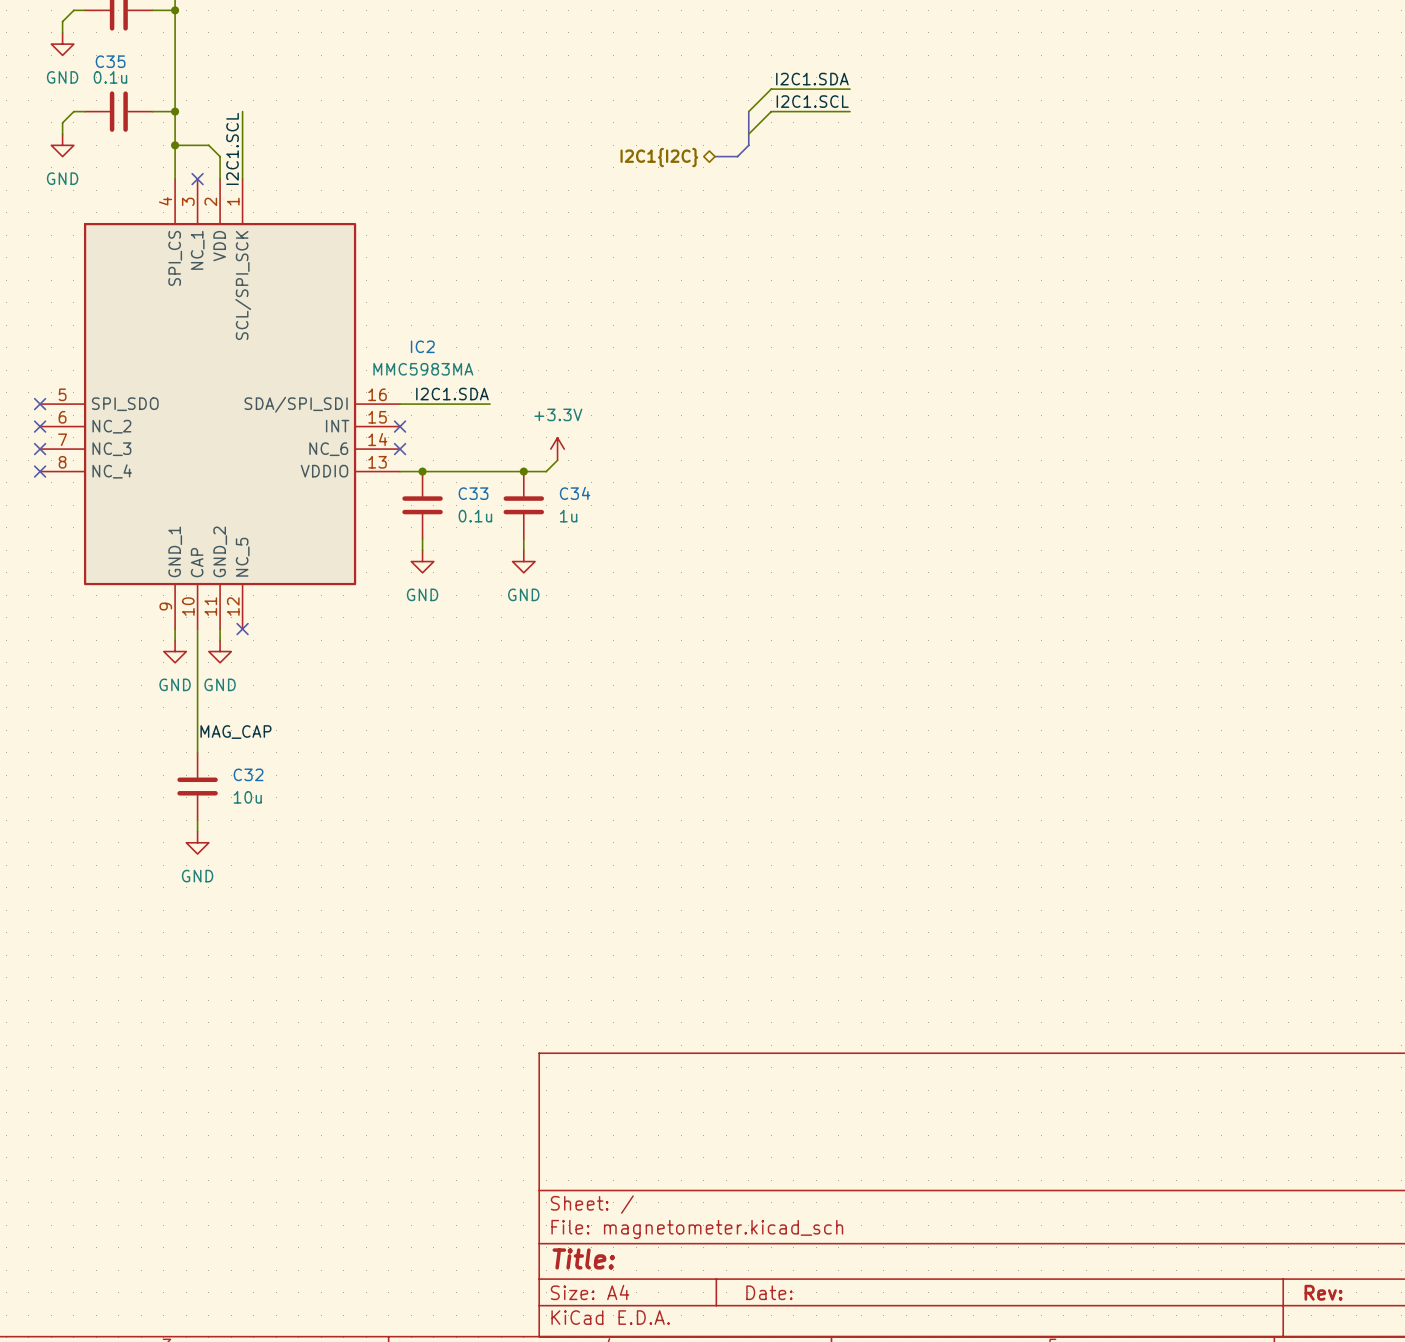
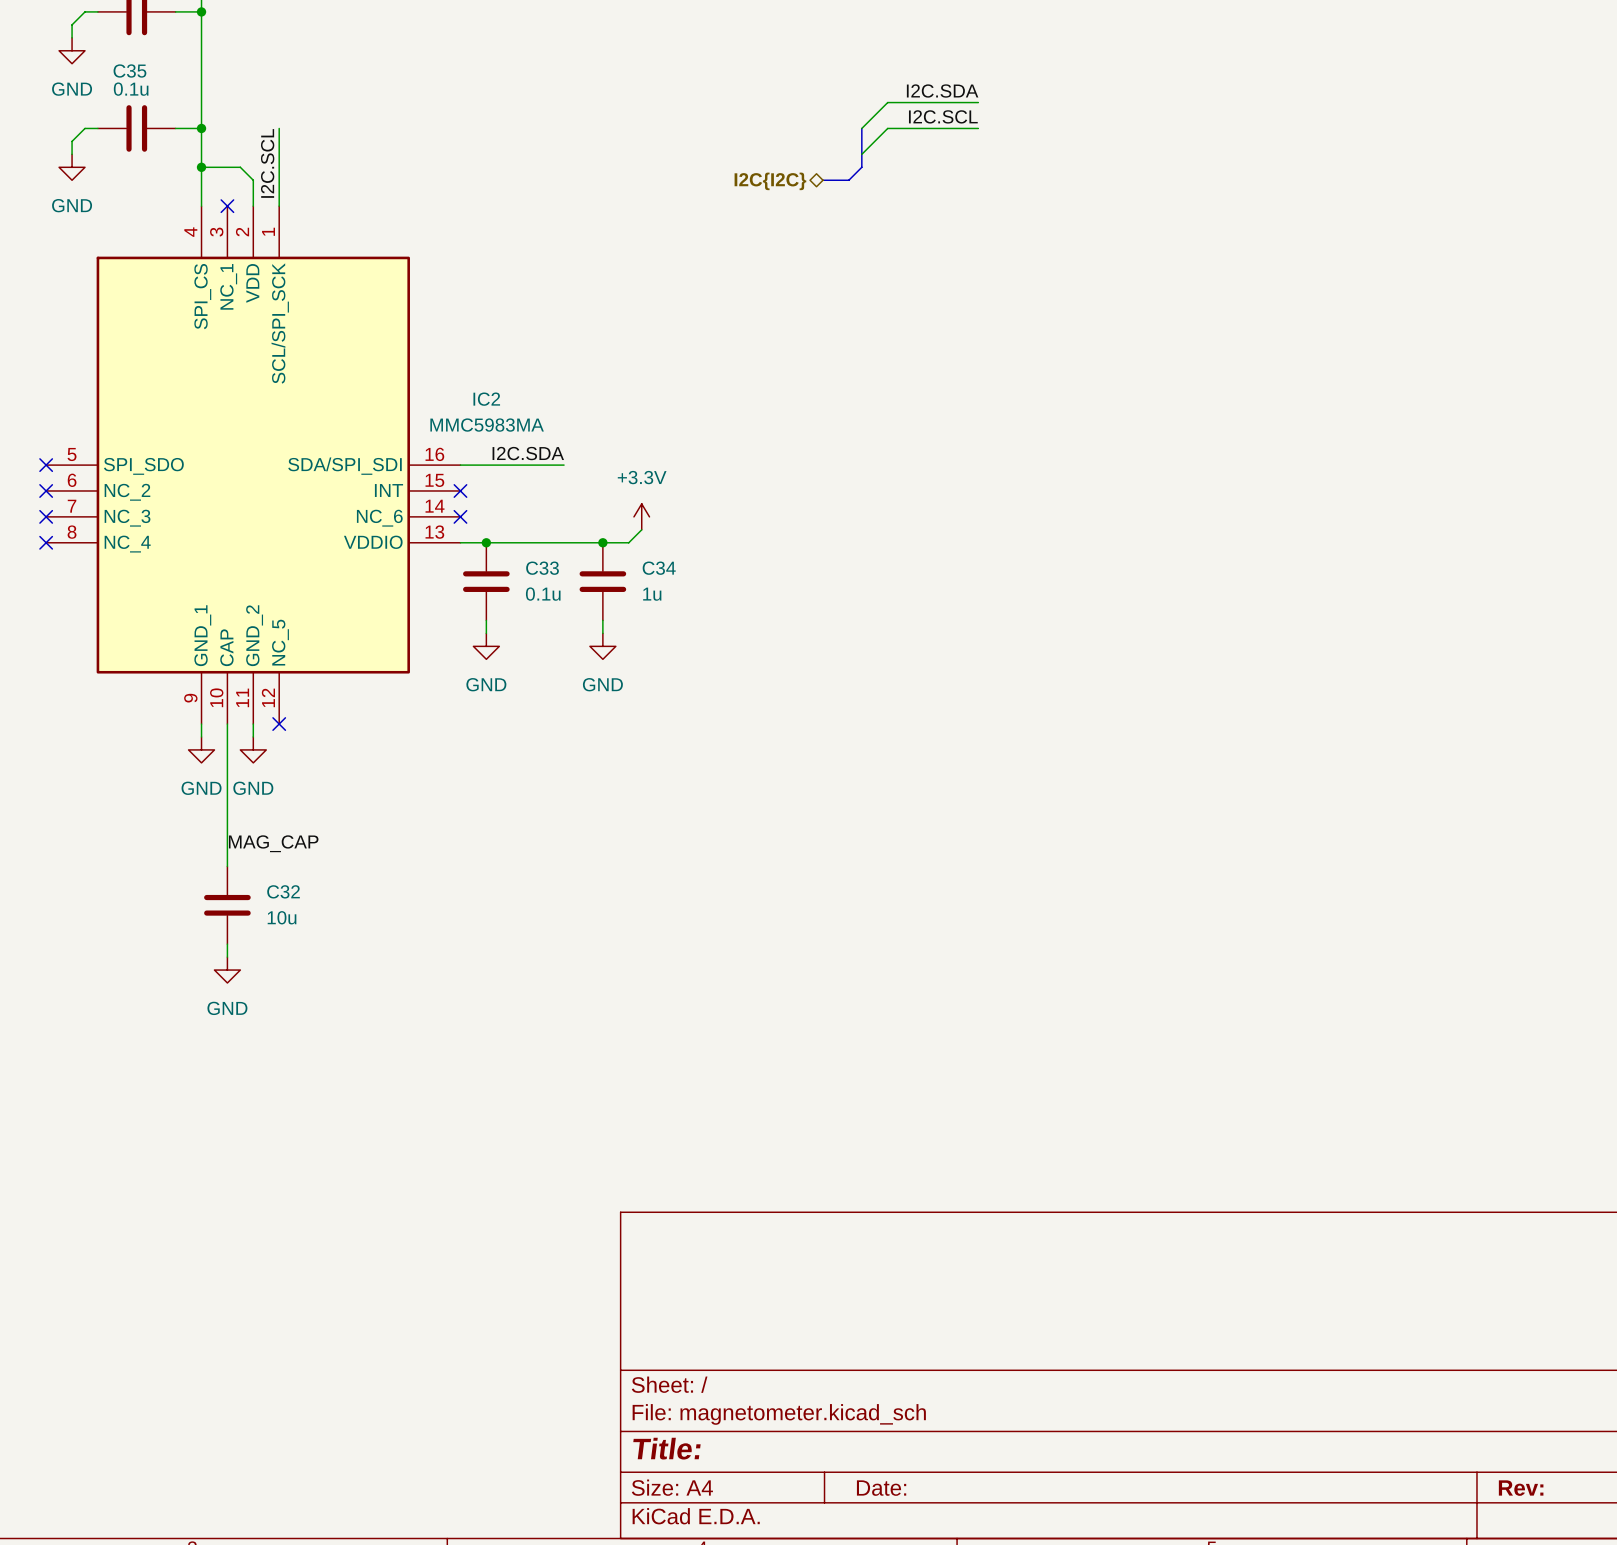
label: I2C1.SDA (812, 79) -> I2C.SDA (942, 91)
label: I2C1.SCL (812, 101) -> I2C.SCL (943, 116)
label: I2C1.SCL (232, 148) -> I2C.SCL (267, 163)
hierarchical label: I2C1{I2C} (659, 157) -> I2C{I2C} (770, 181)
label: I2C1.SDA (452, 394) -> I2C.SDA (528, 453)

